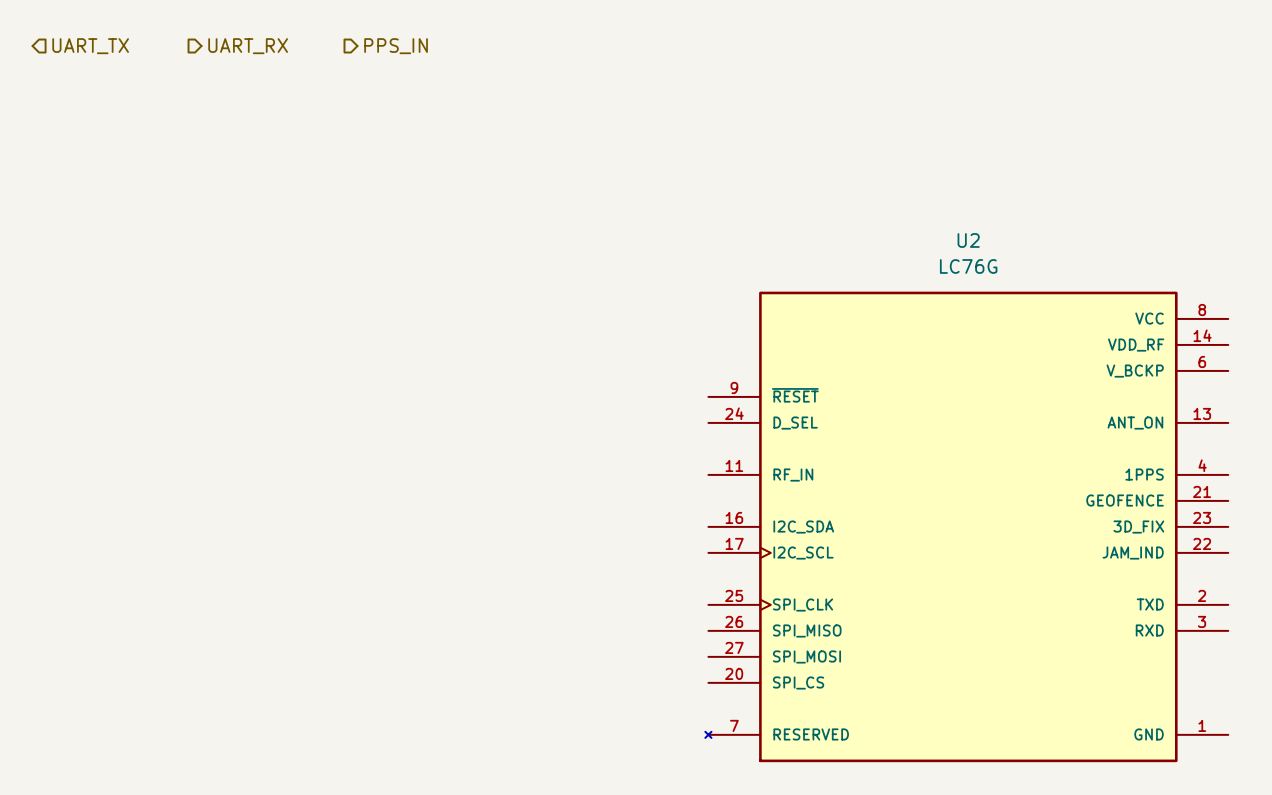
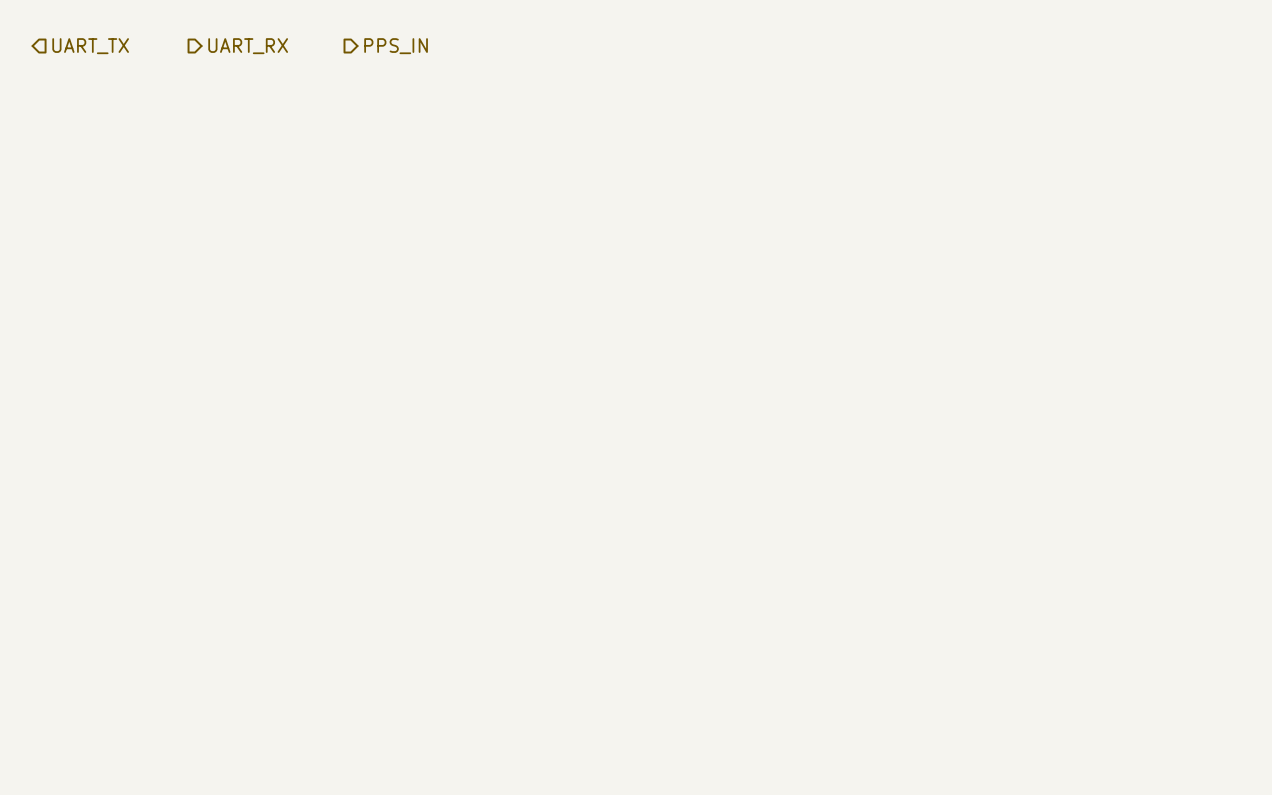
U2: LC76G (966, 526) -> none

